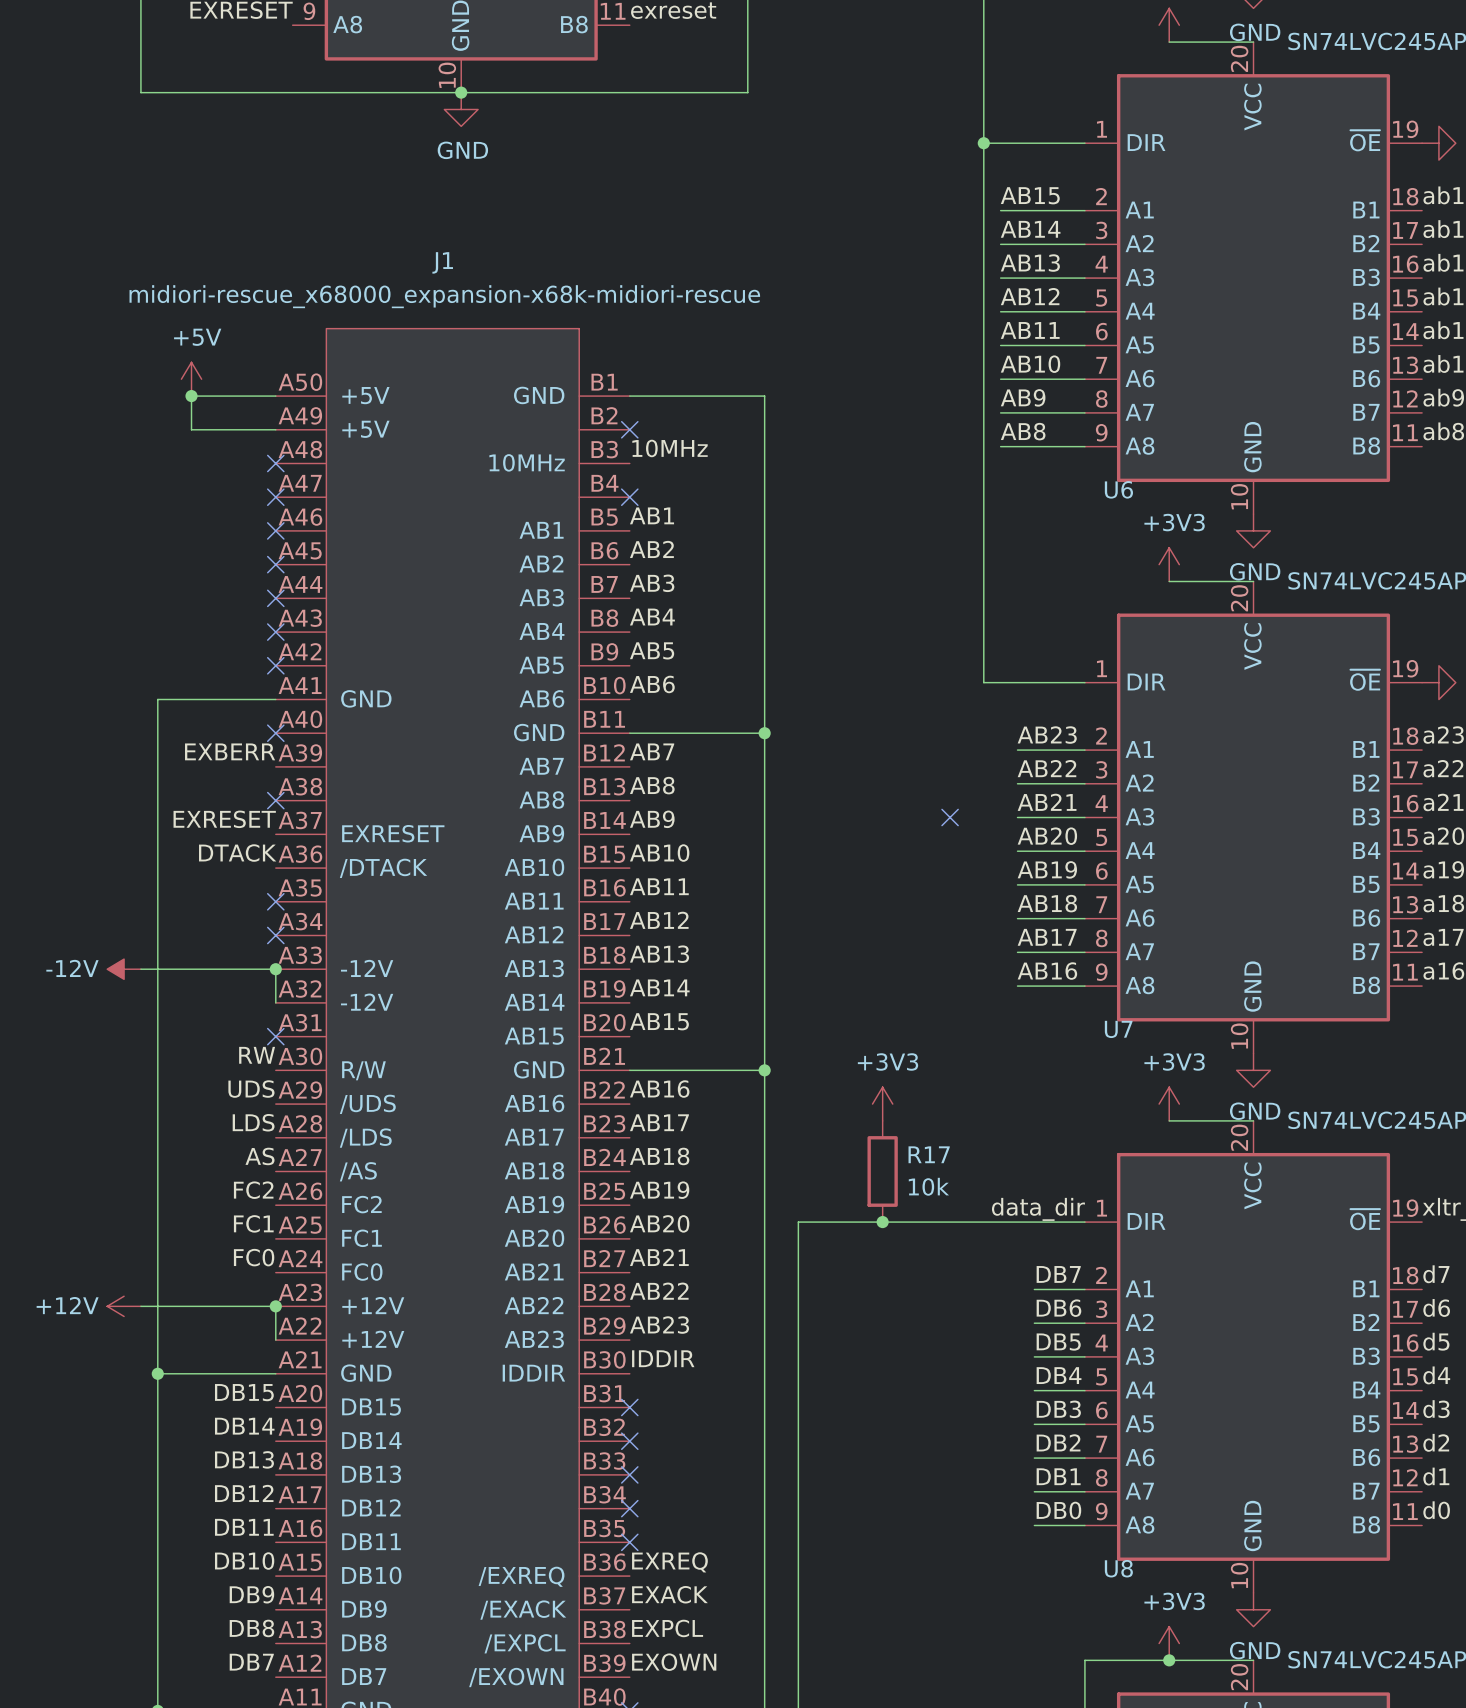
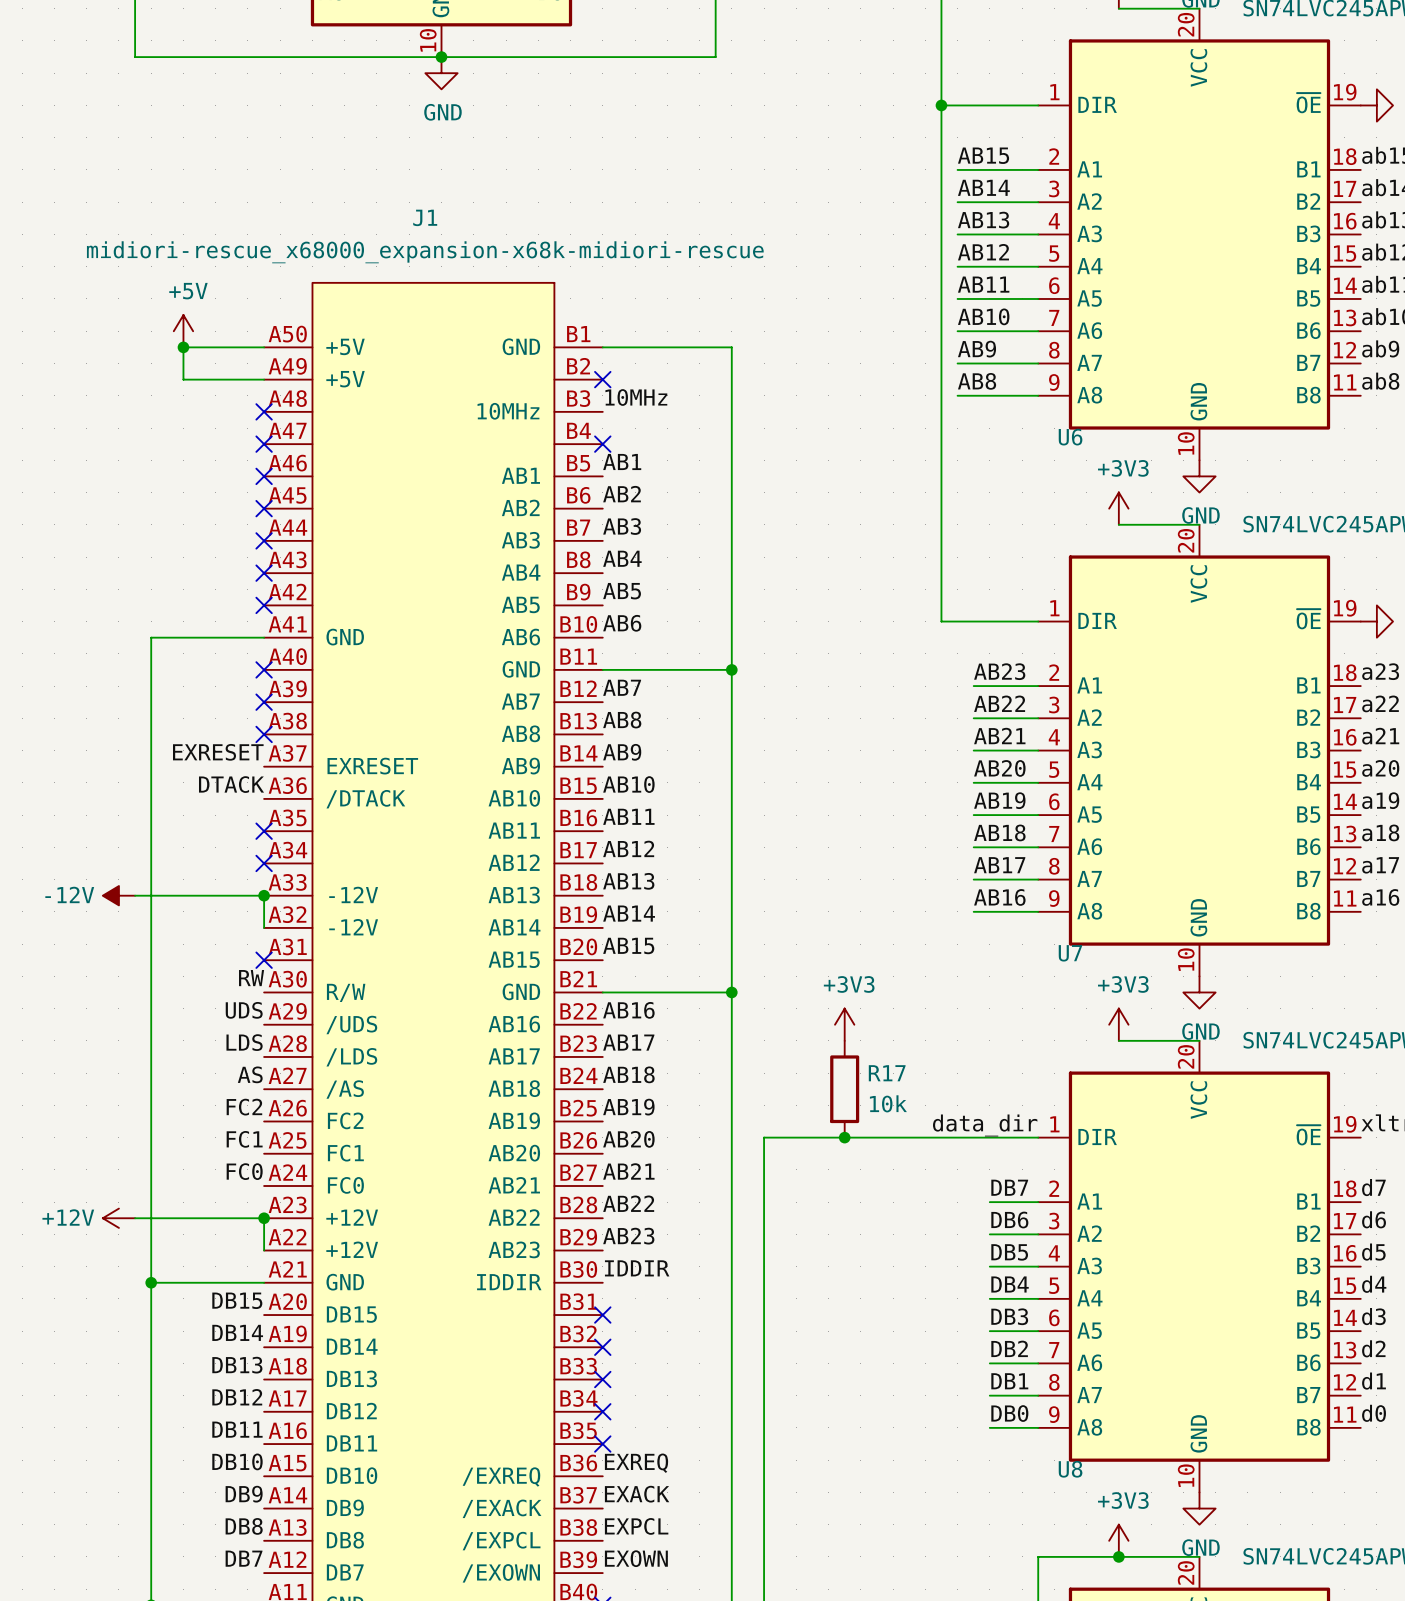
label: EXBERR (230, 751) -> none
no-connect mark: none -> (264, 702)
no-connect mark: (950, 817) -> none

